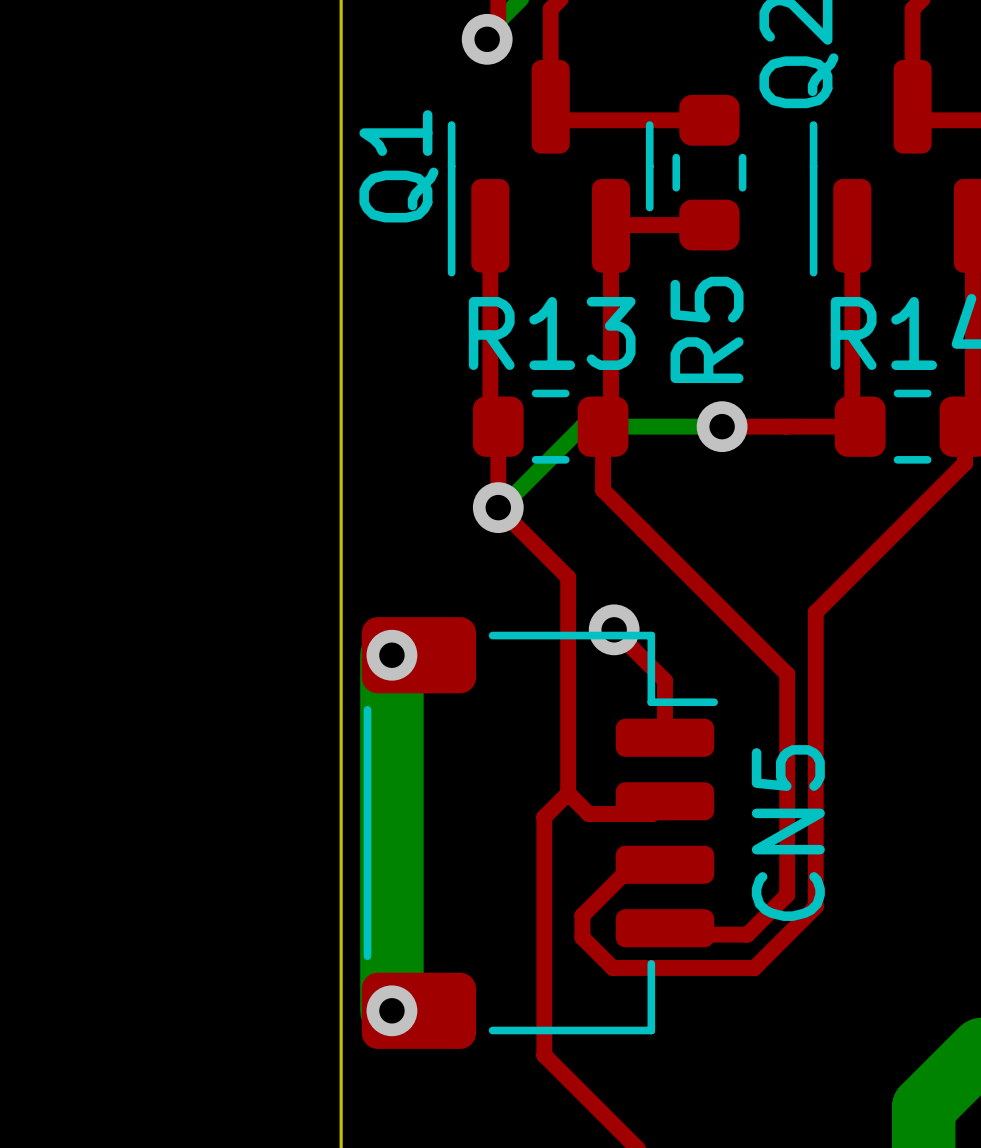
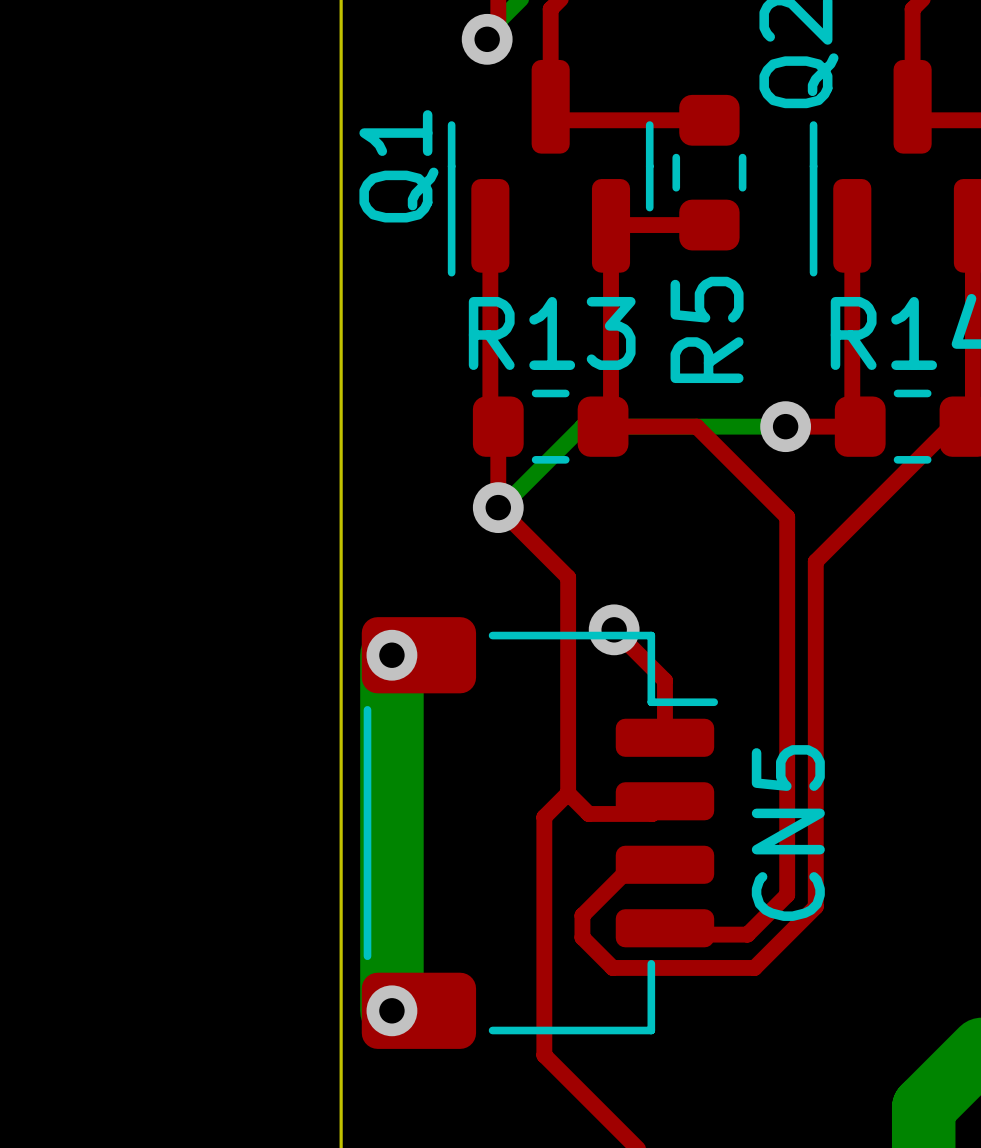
top track: (603, 426) (603, 490) (787, 674) -> (603, 426) (696, 426) (787, 517) (787, 674)
top track: (722, 426) (785, 426) -> none
bottom track: none -> (722, 426) (785, 426)
via position: (722, 426) -> (785, 426)
top track: (964, 426) (964, 463) (815, 612) -> (964, 426) (950, 426) (815, 561) (815, 612)

